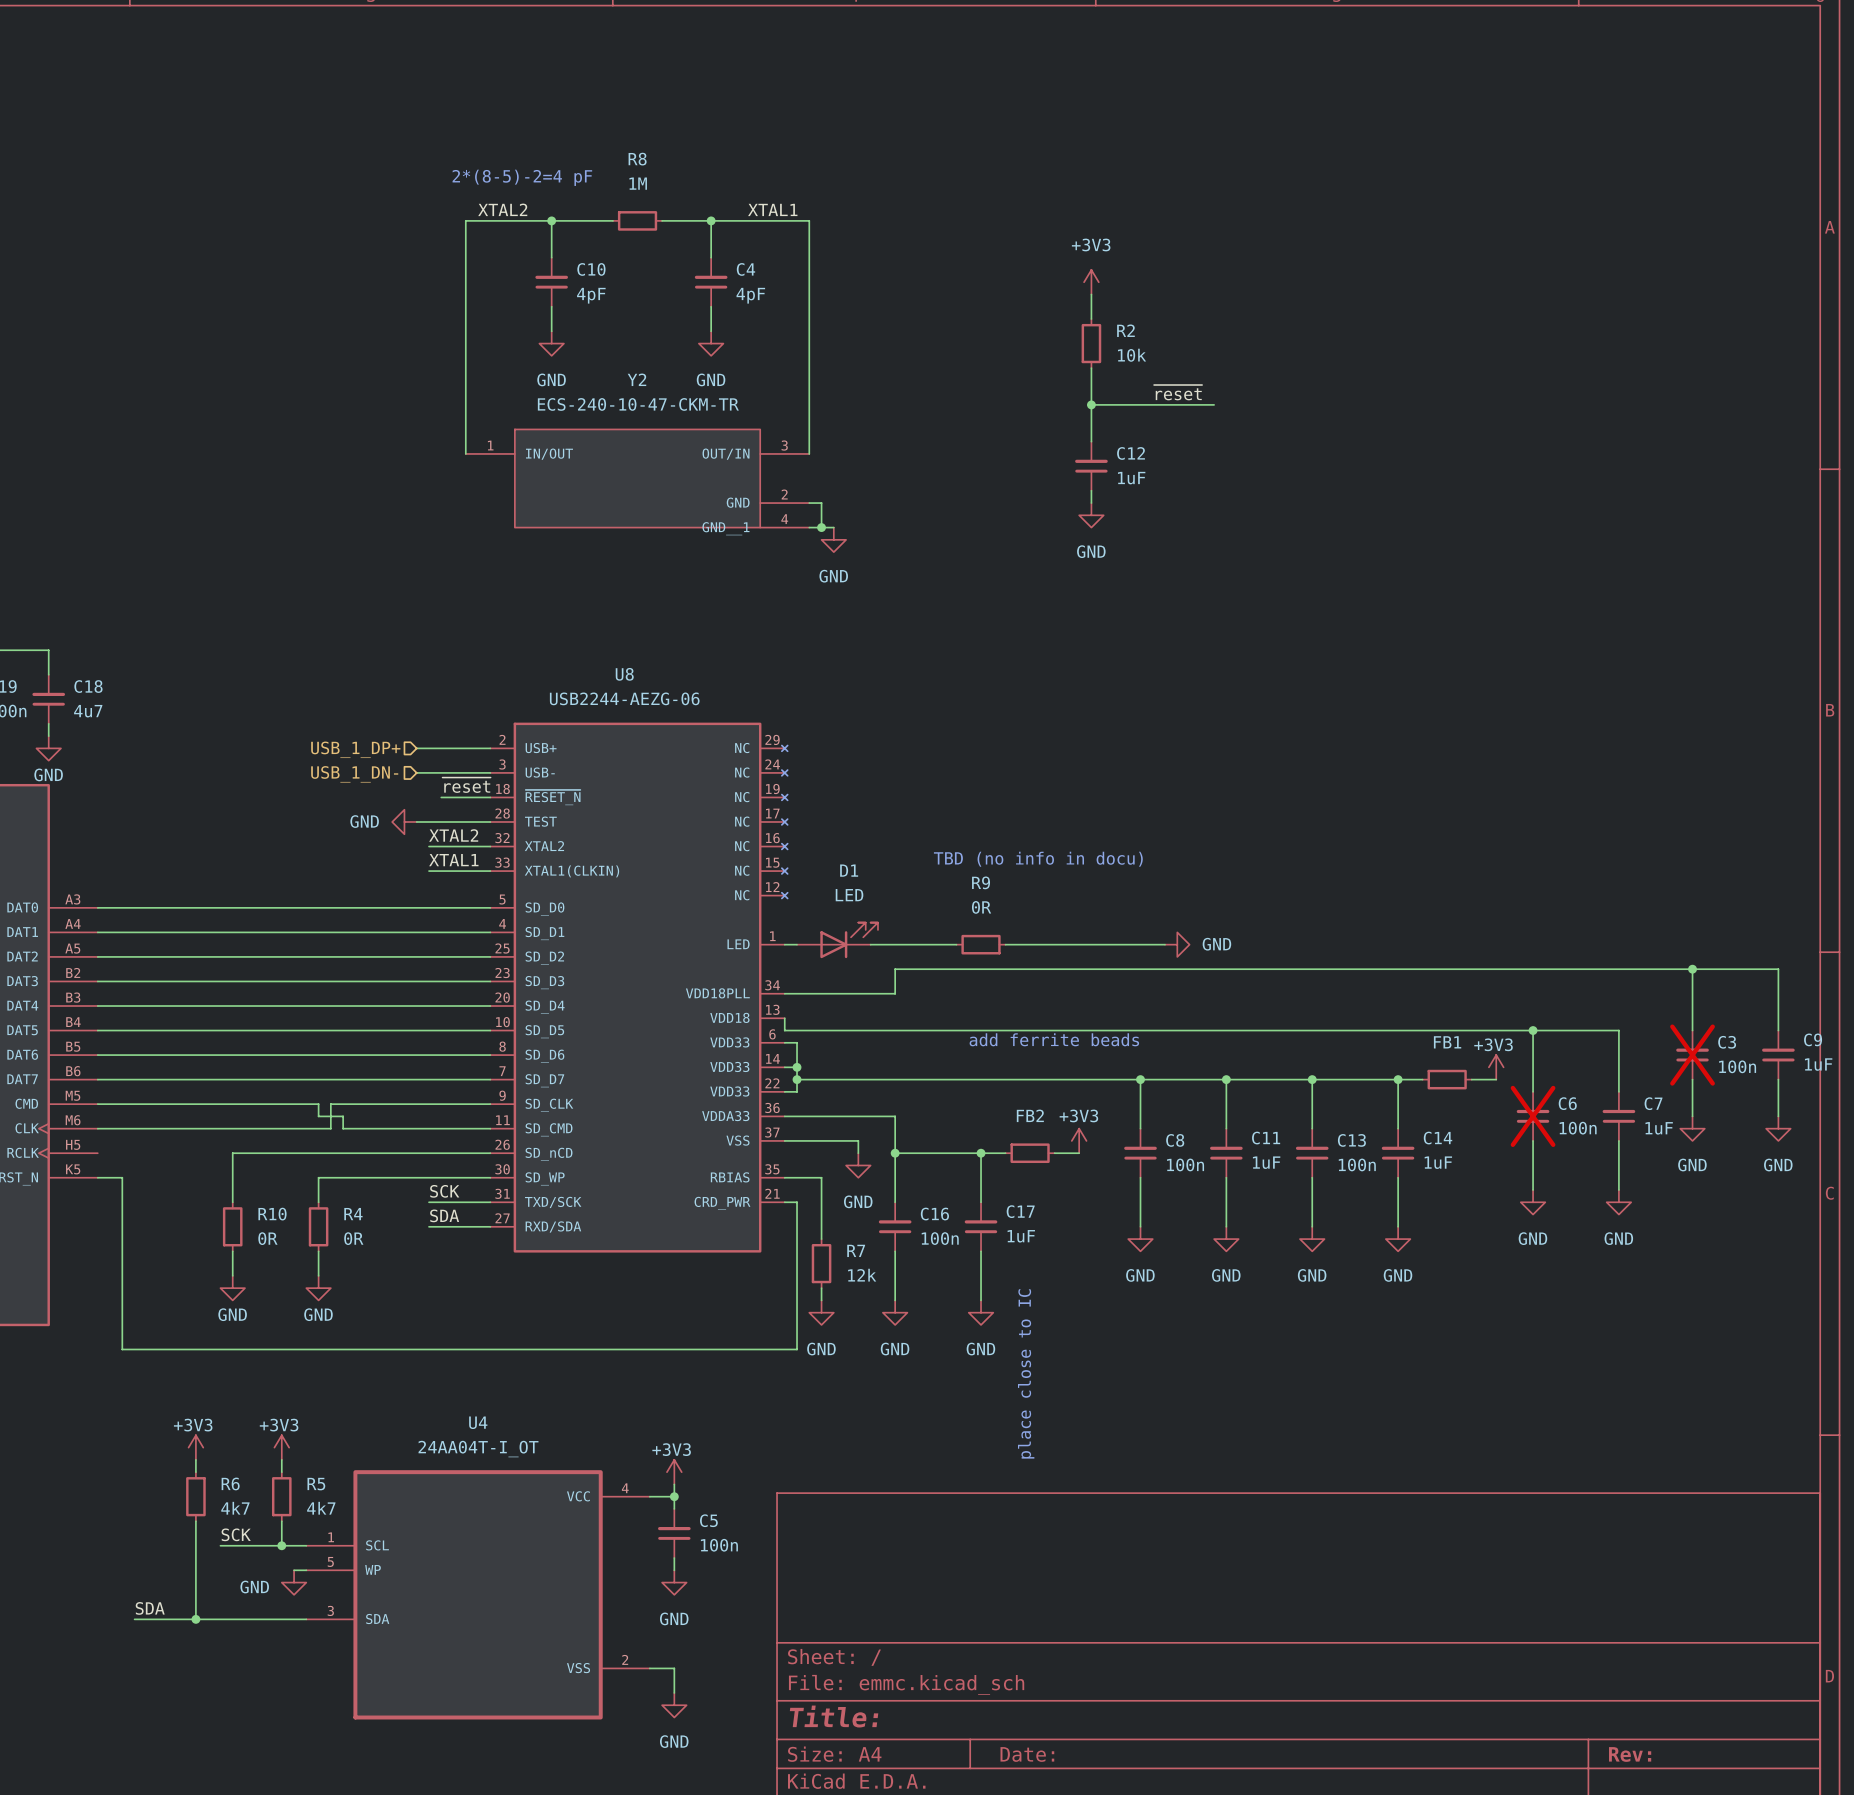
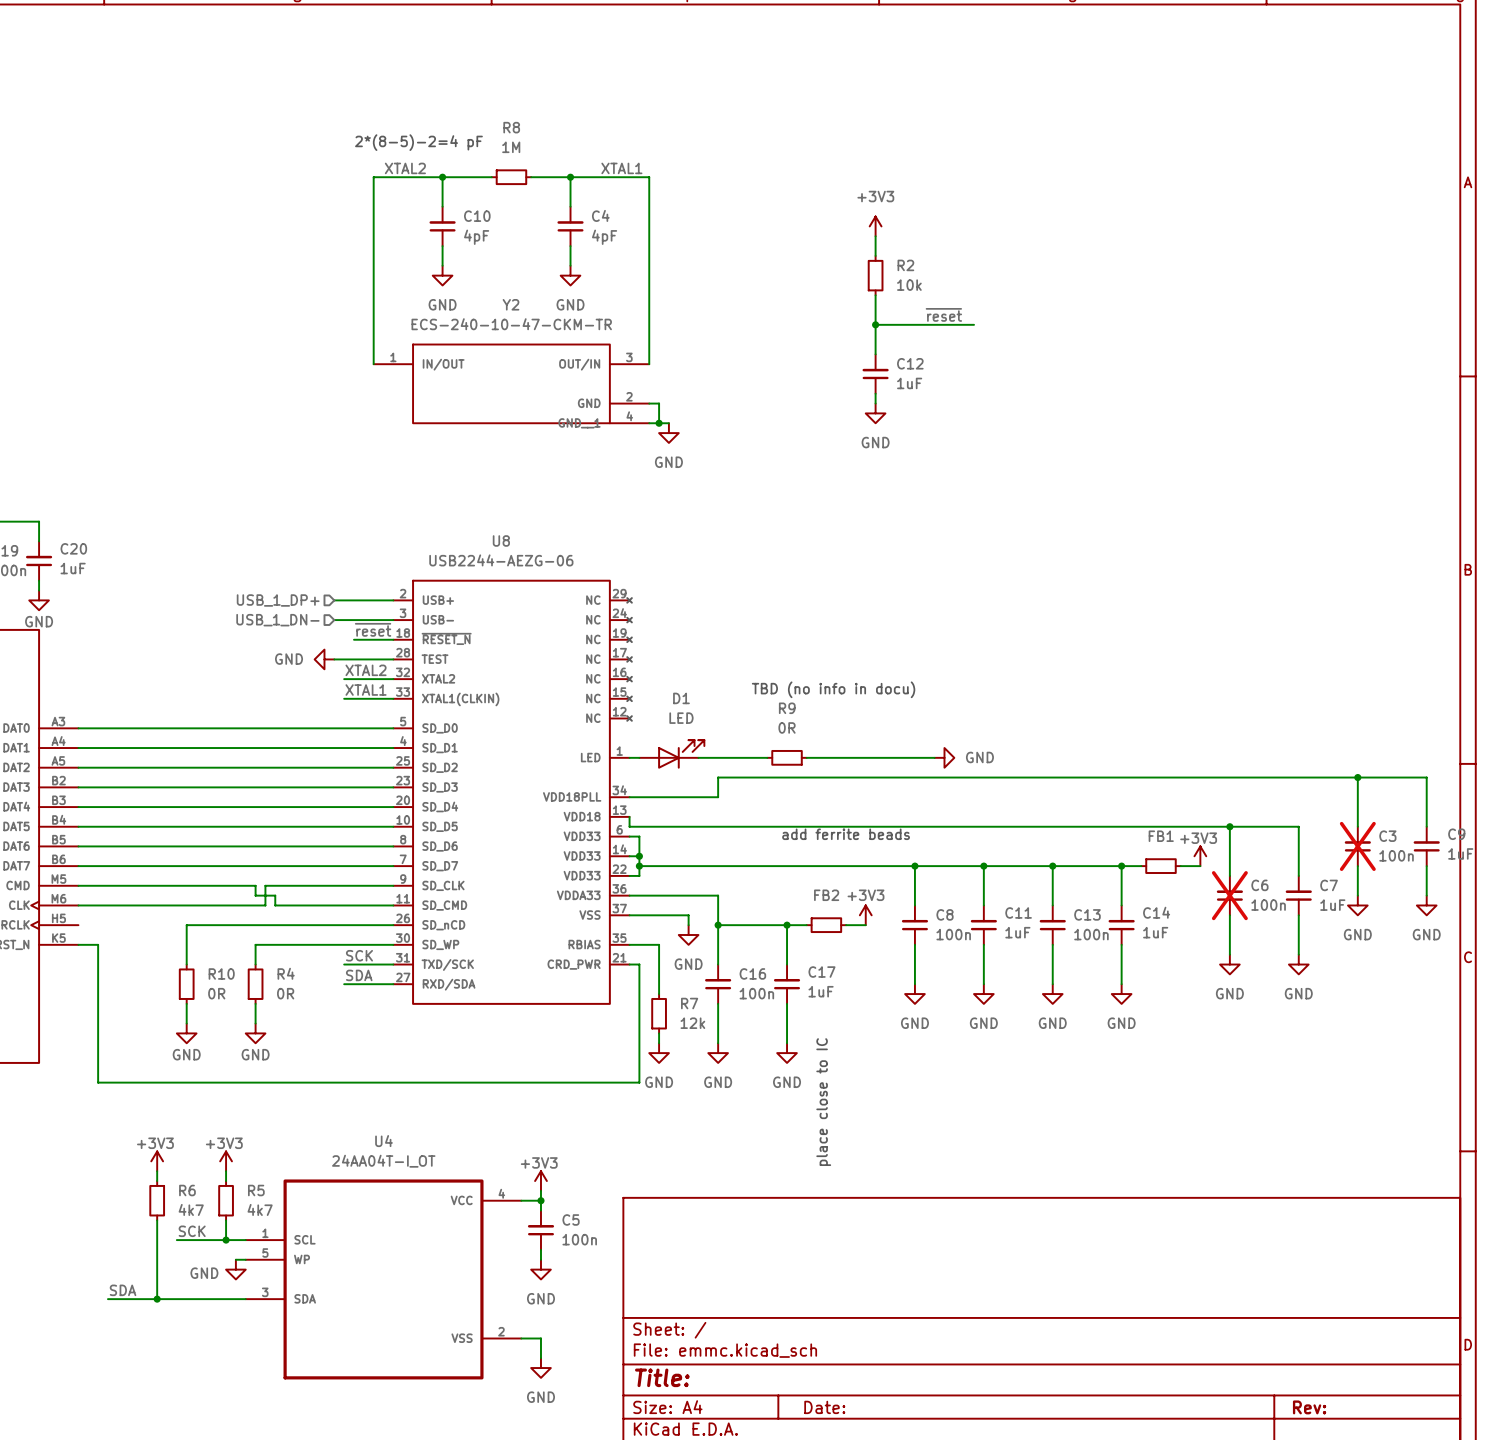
C18 name: C18 (88, 686) -> C20 (73, 548)
C18 text: 4u7 (88, 711) -> 1uF (73, 568)

